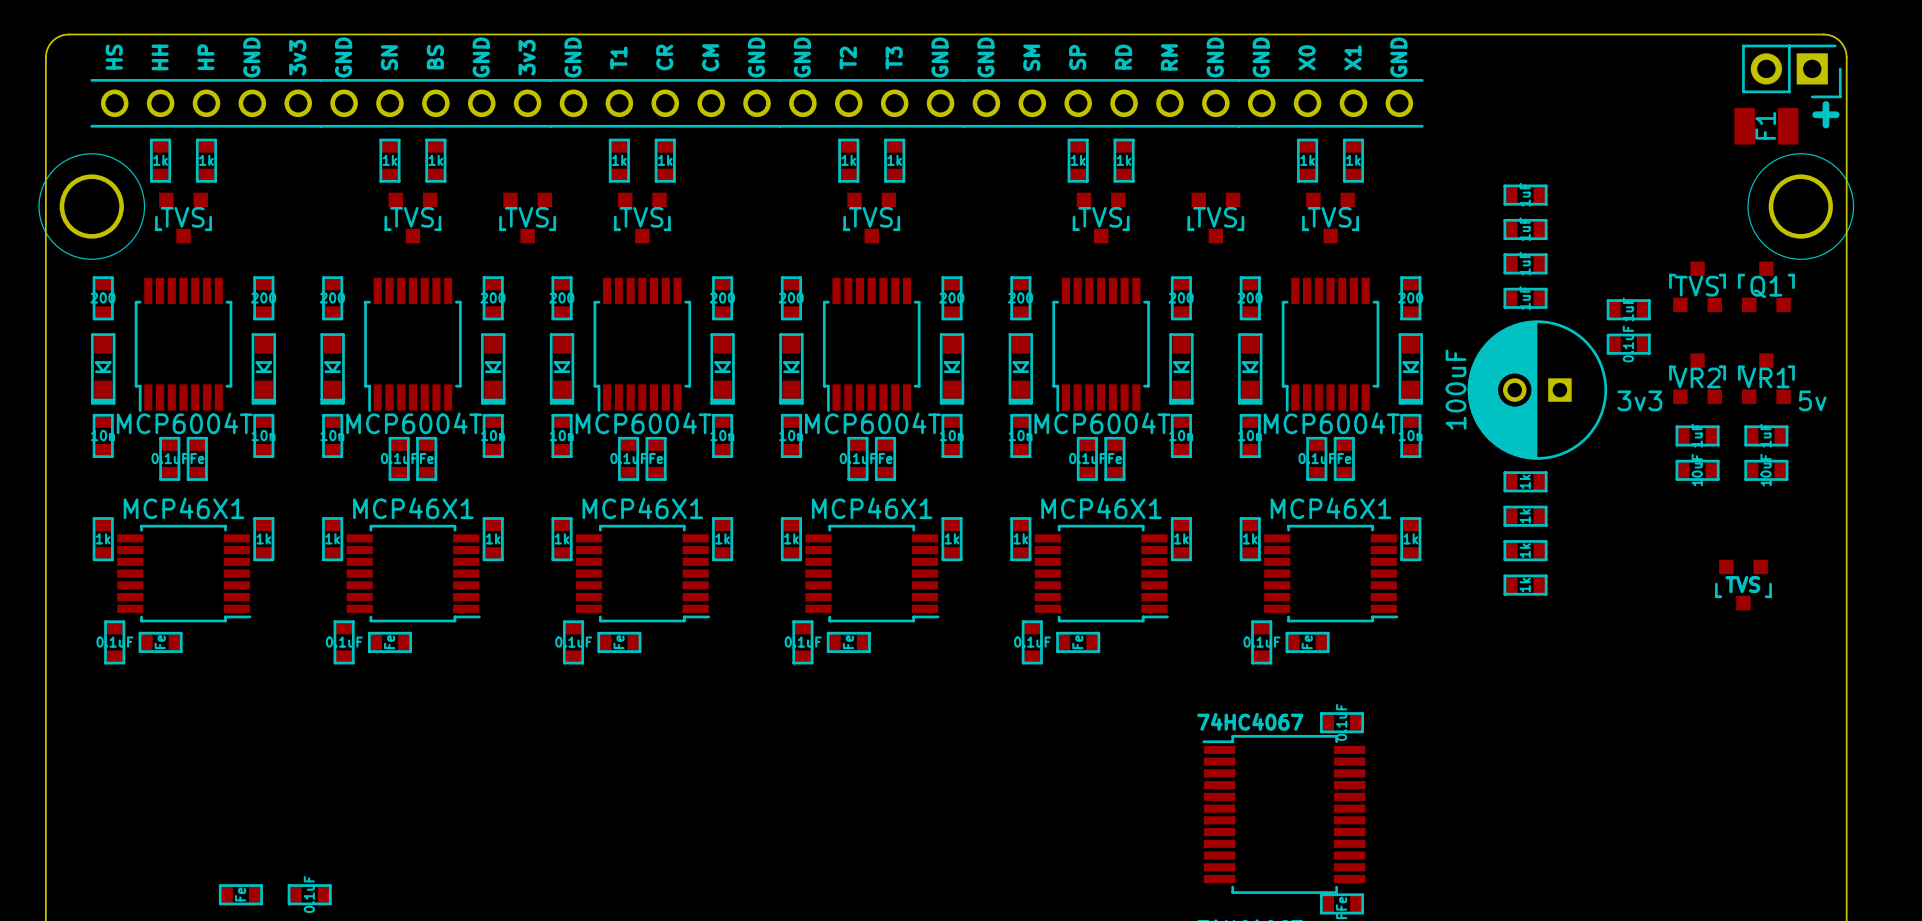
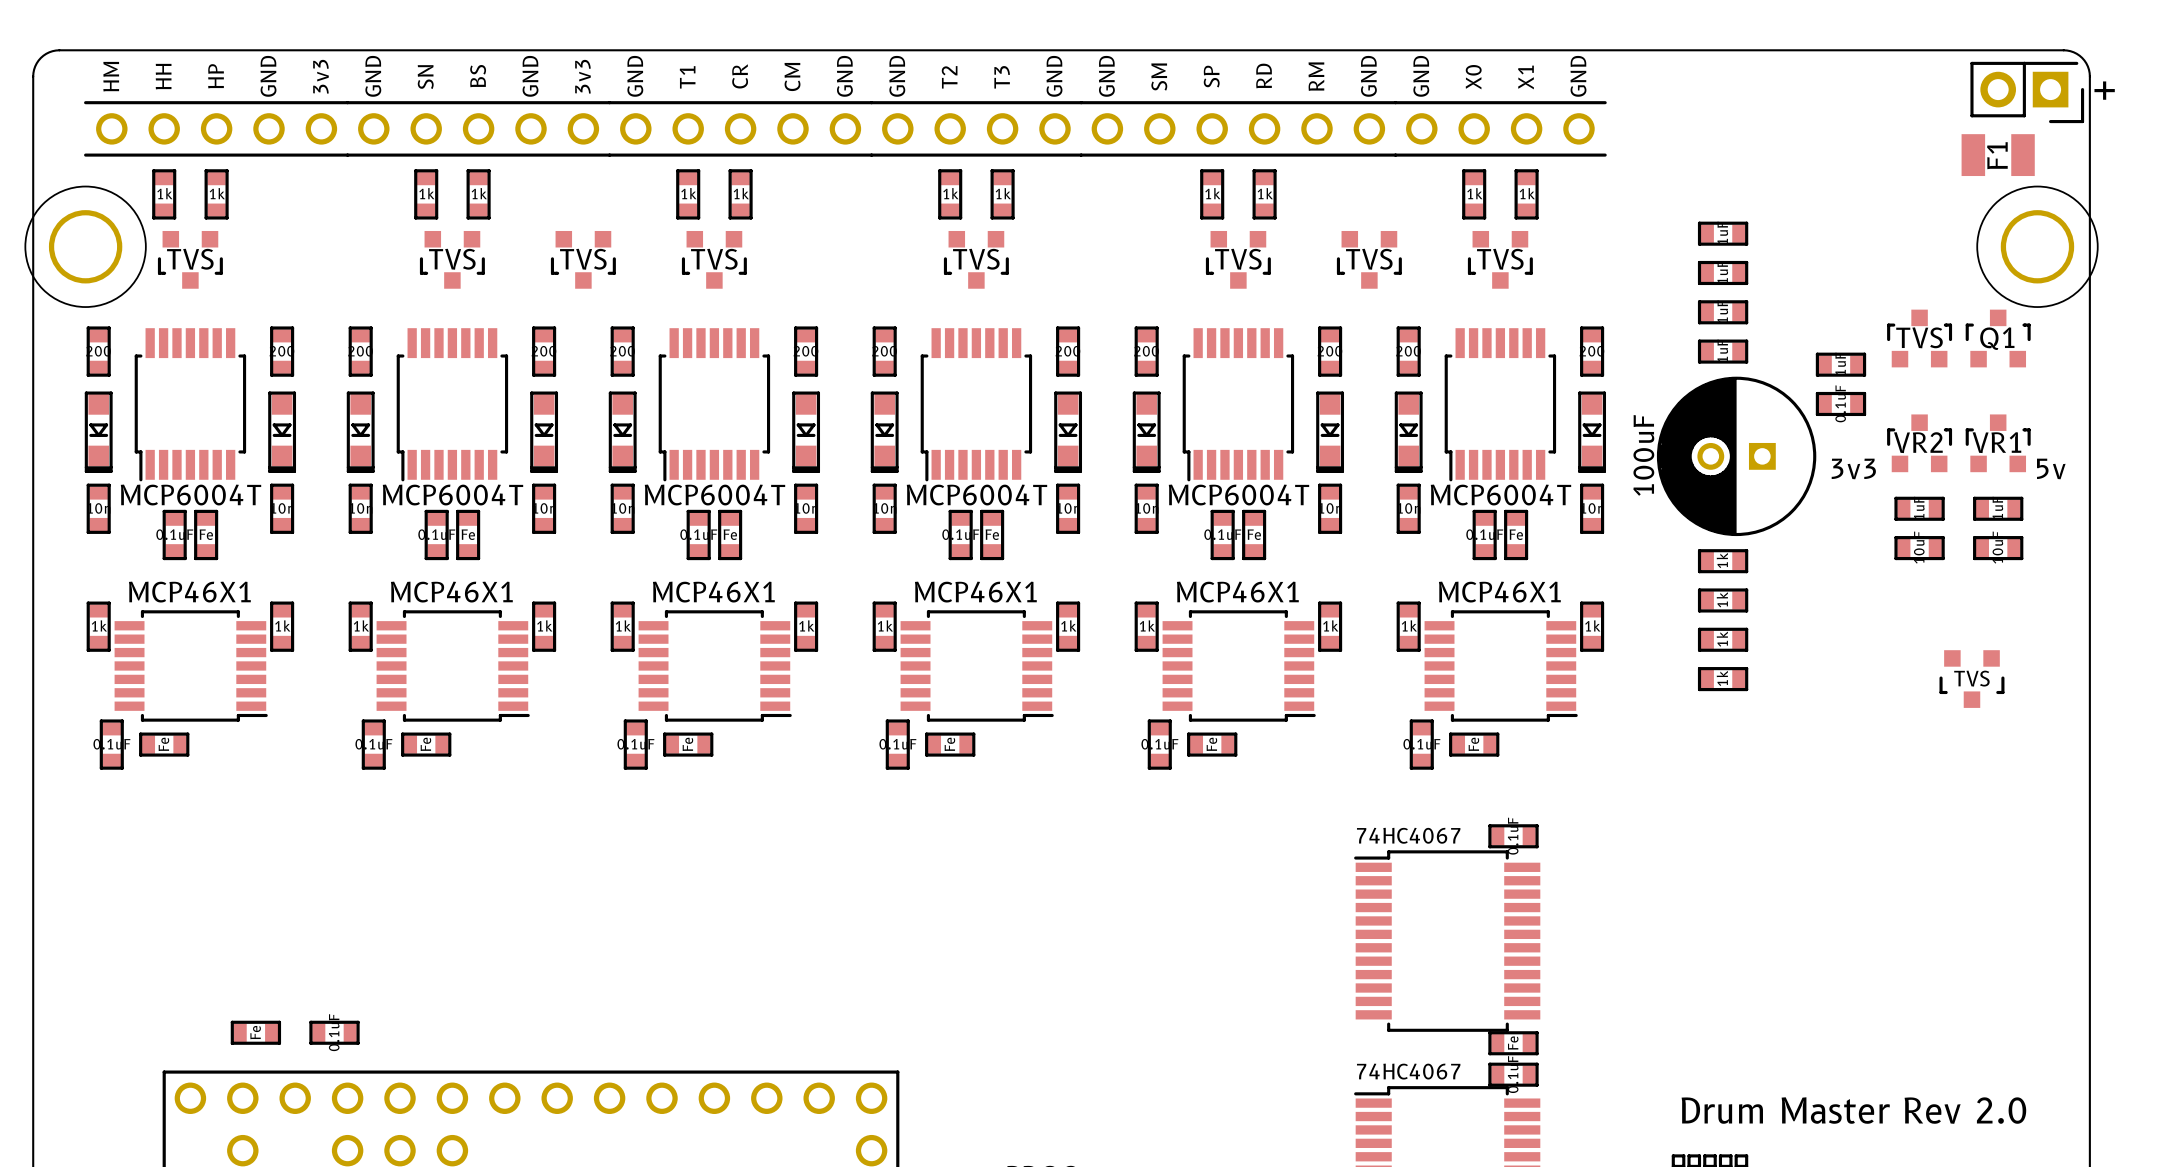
part text: HS (114, 57) -> HM (111, 76)
part text position: + (1825, 114) -> + (2104, 90)

